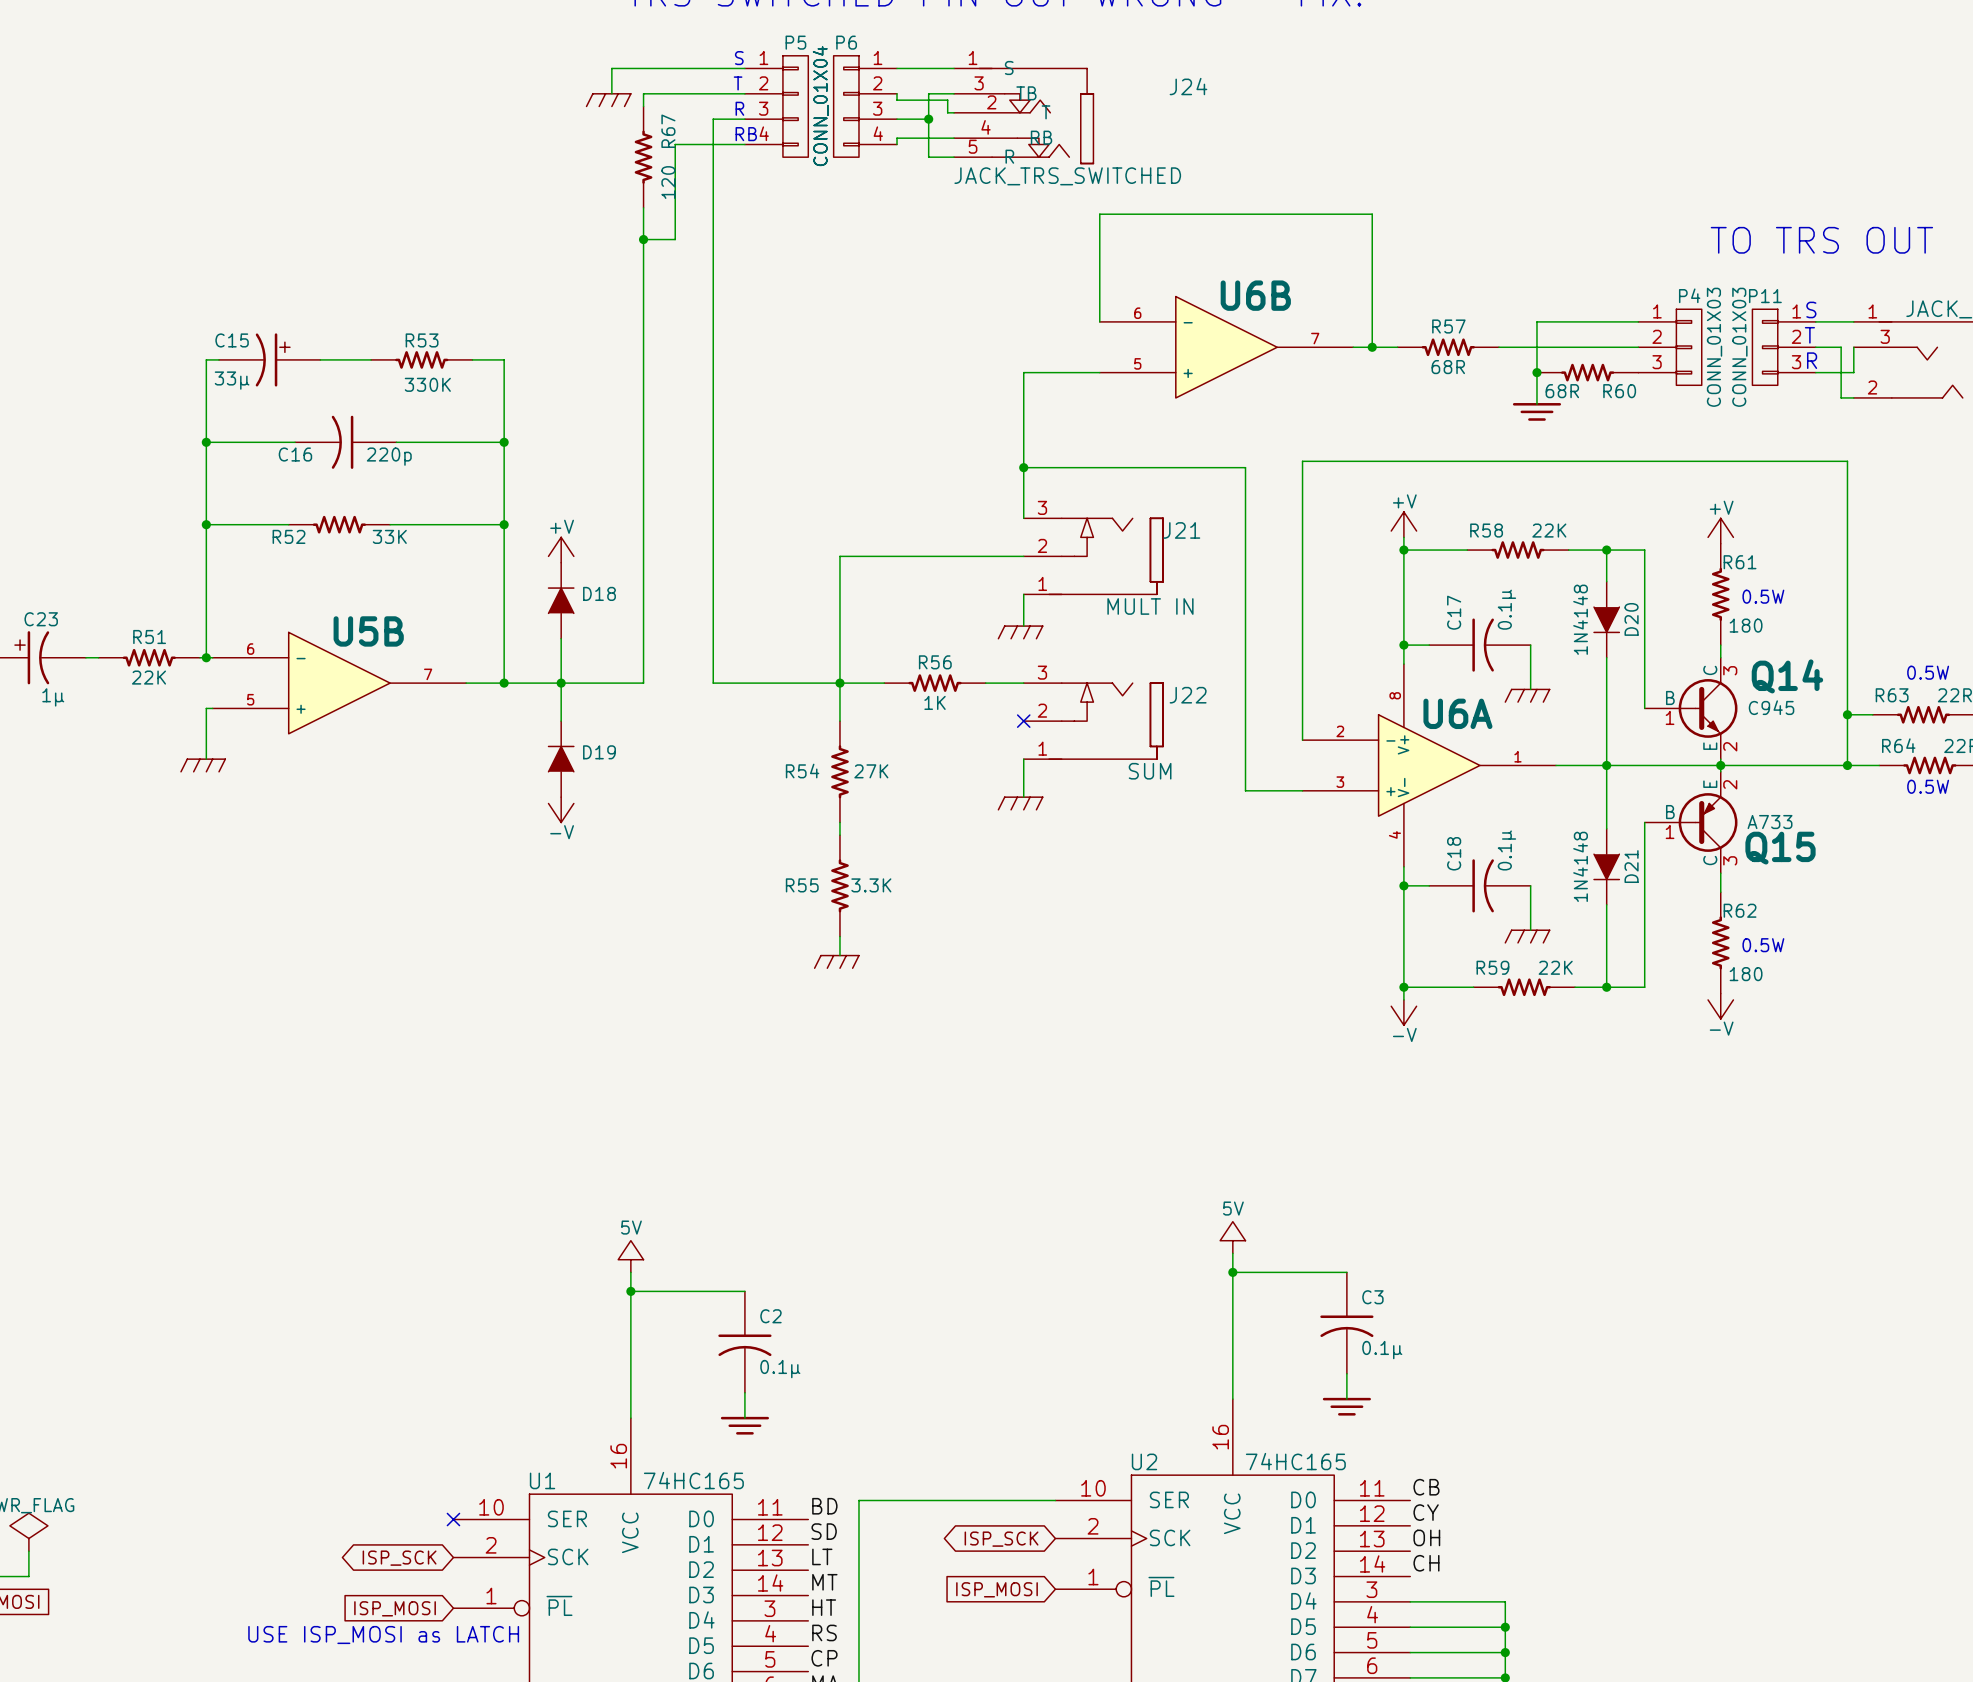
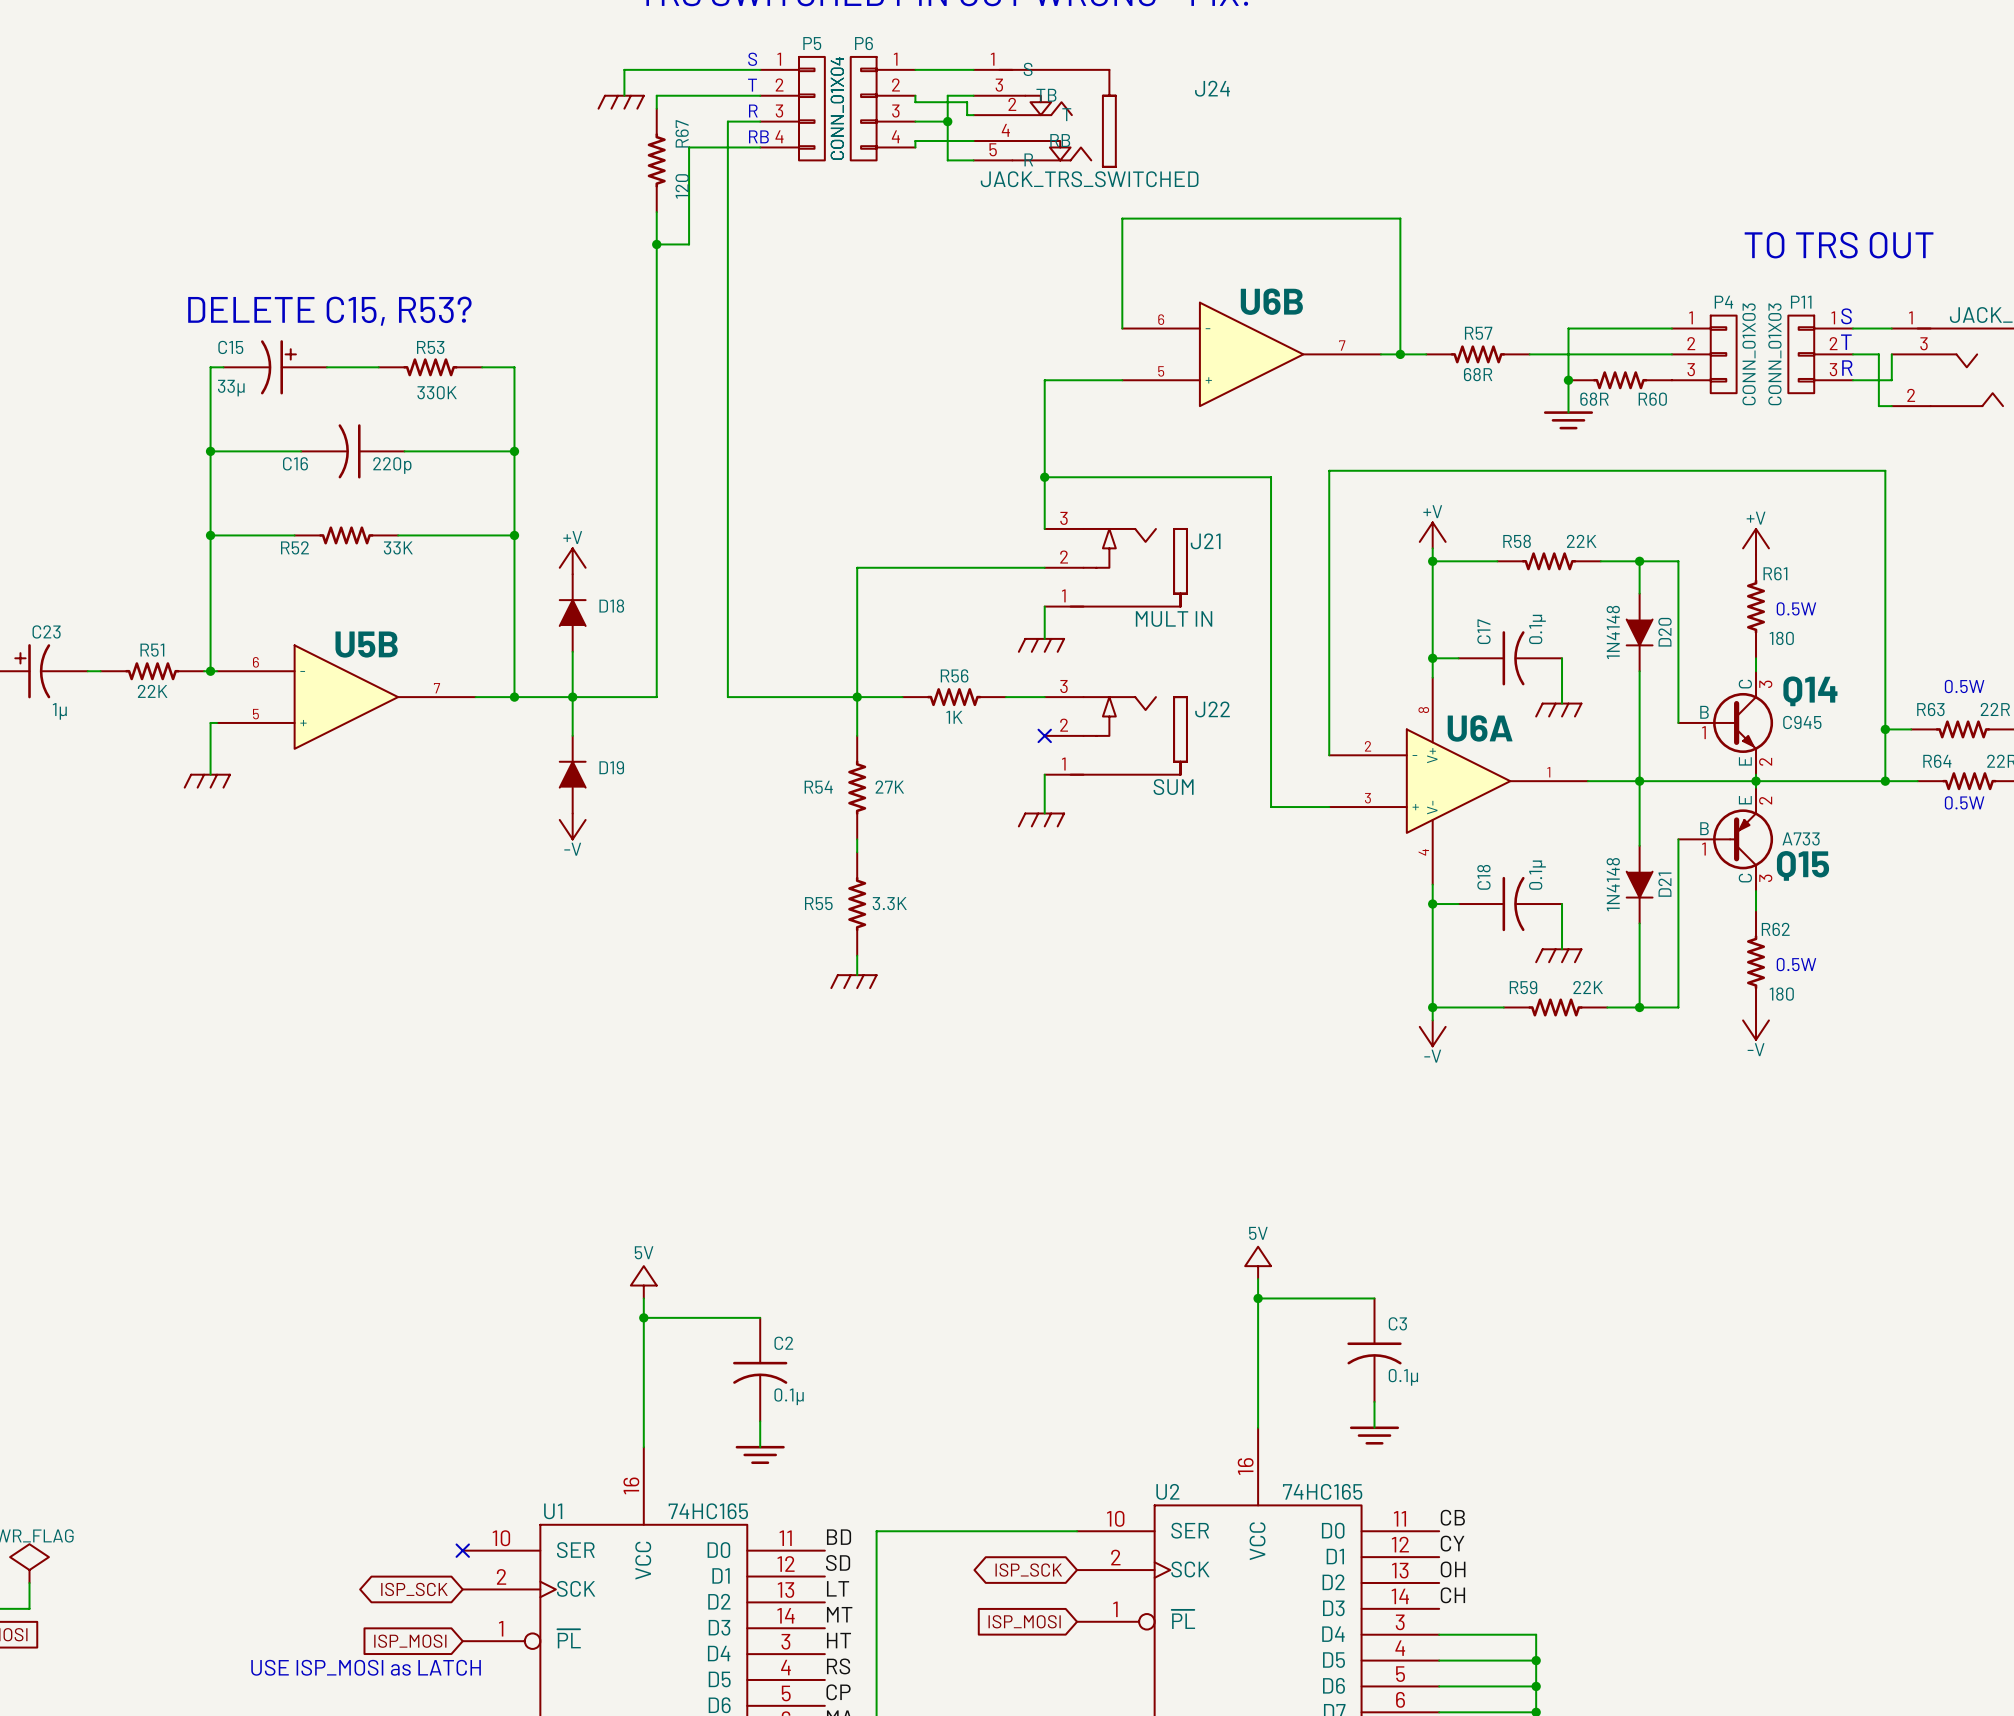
text: none -> DELETE C15, R53? (329, 311)

